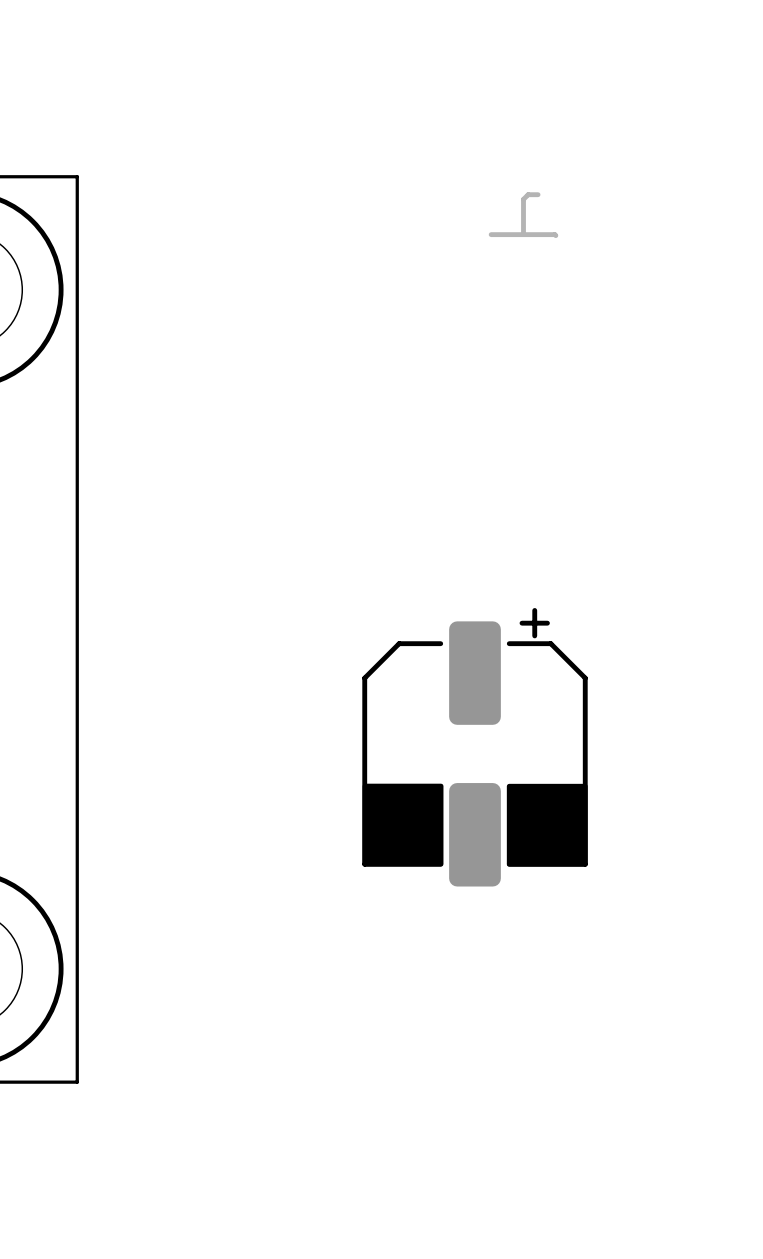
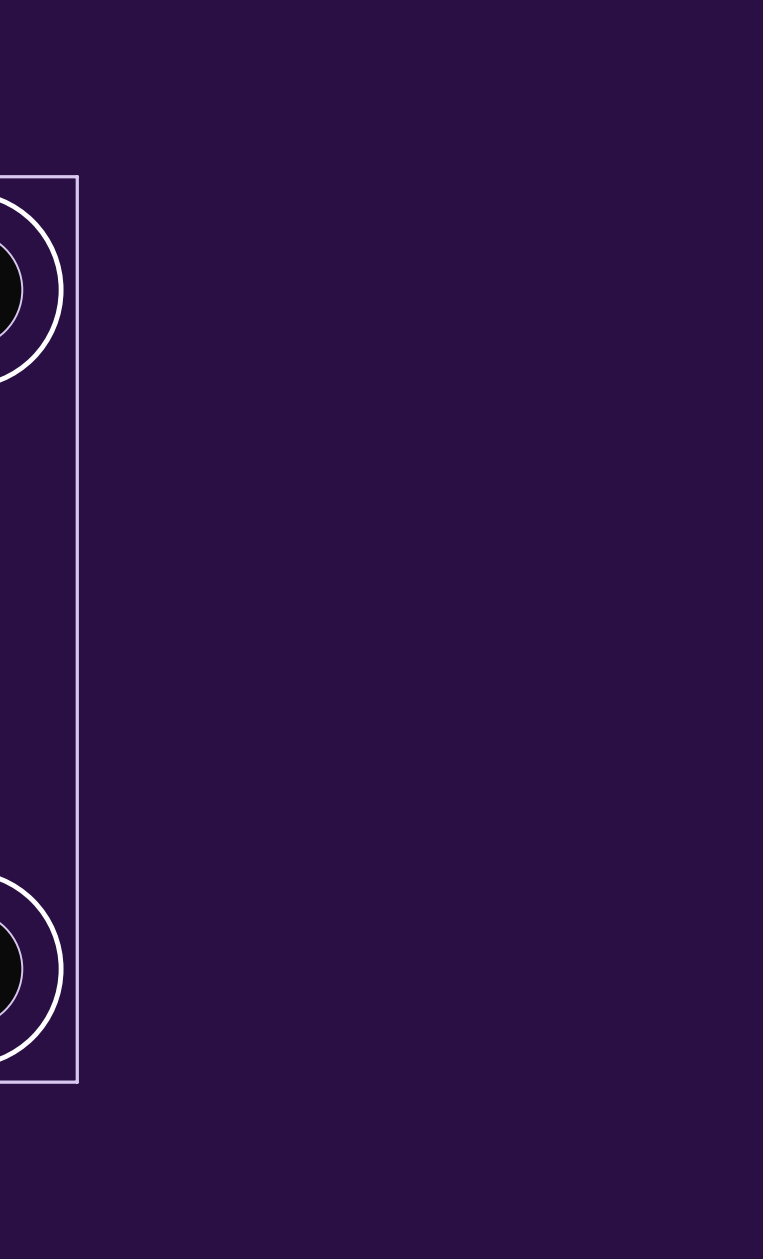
track: (538, 194) (528, 194) (523, 199) (523, 234) -> none
track: (491, 234) (555, 235) -> none
part: (474, 747) -> none

